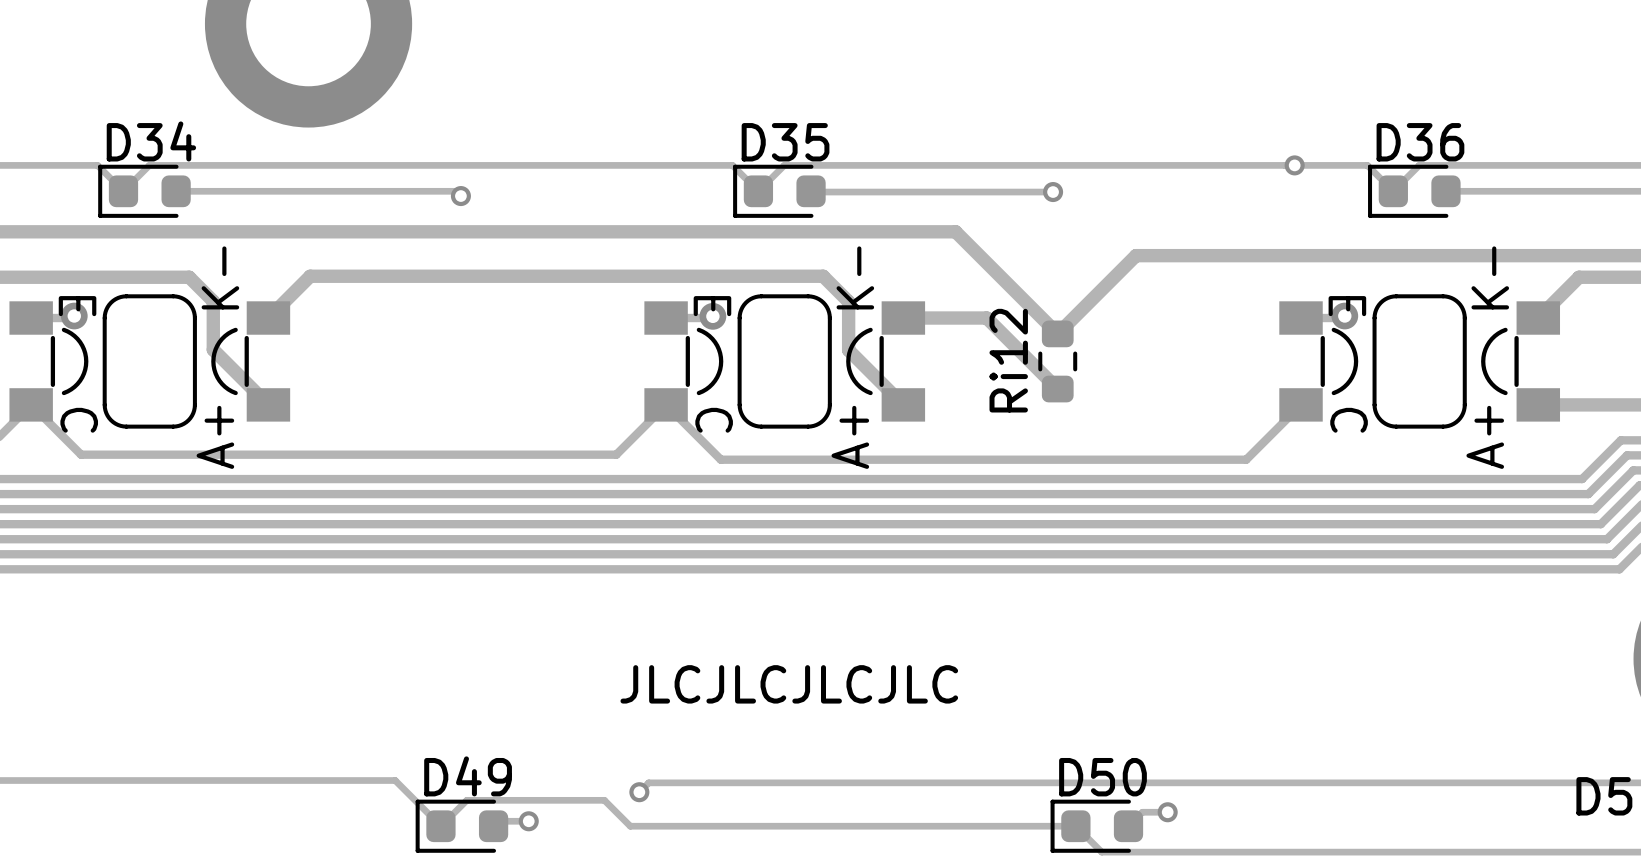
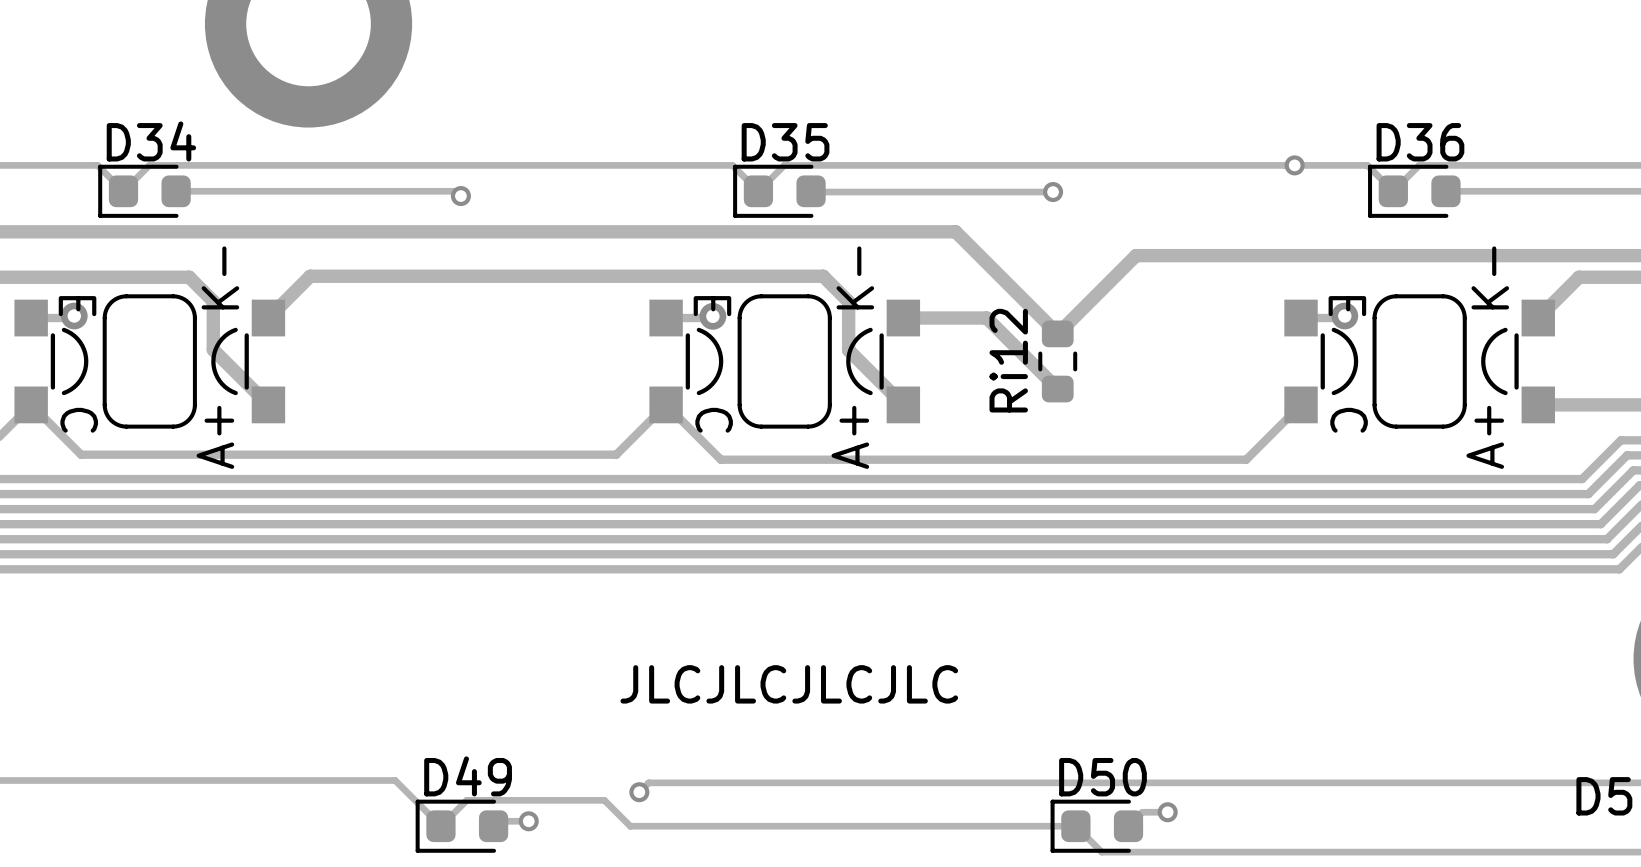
part footprint: [9, 294, 291, 429] -> [14, 294, 286, 429]
part footprint: [644, 294, 926, 429] -> [649, 294, 921, 429]
part footprint: [1279, 294, 1561, 429] -> [1284, 294, 1555, 429]

